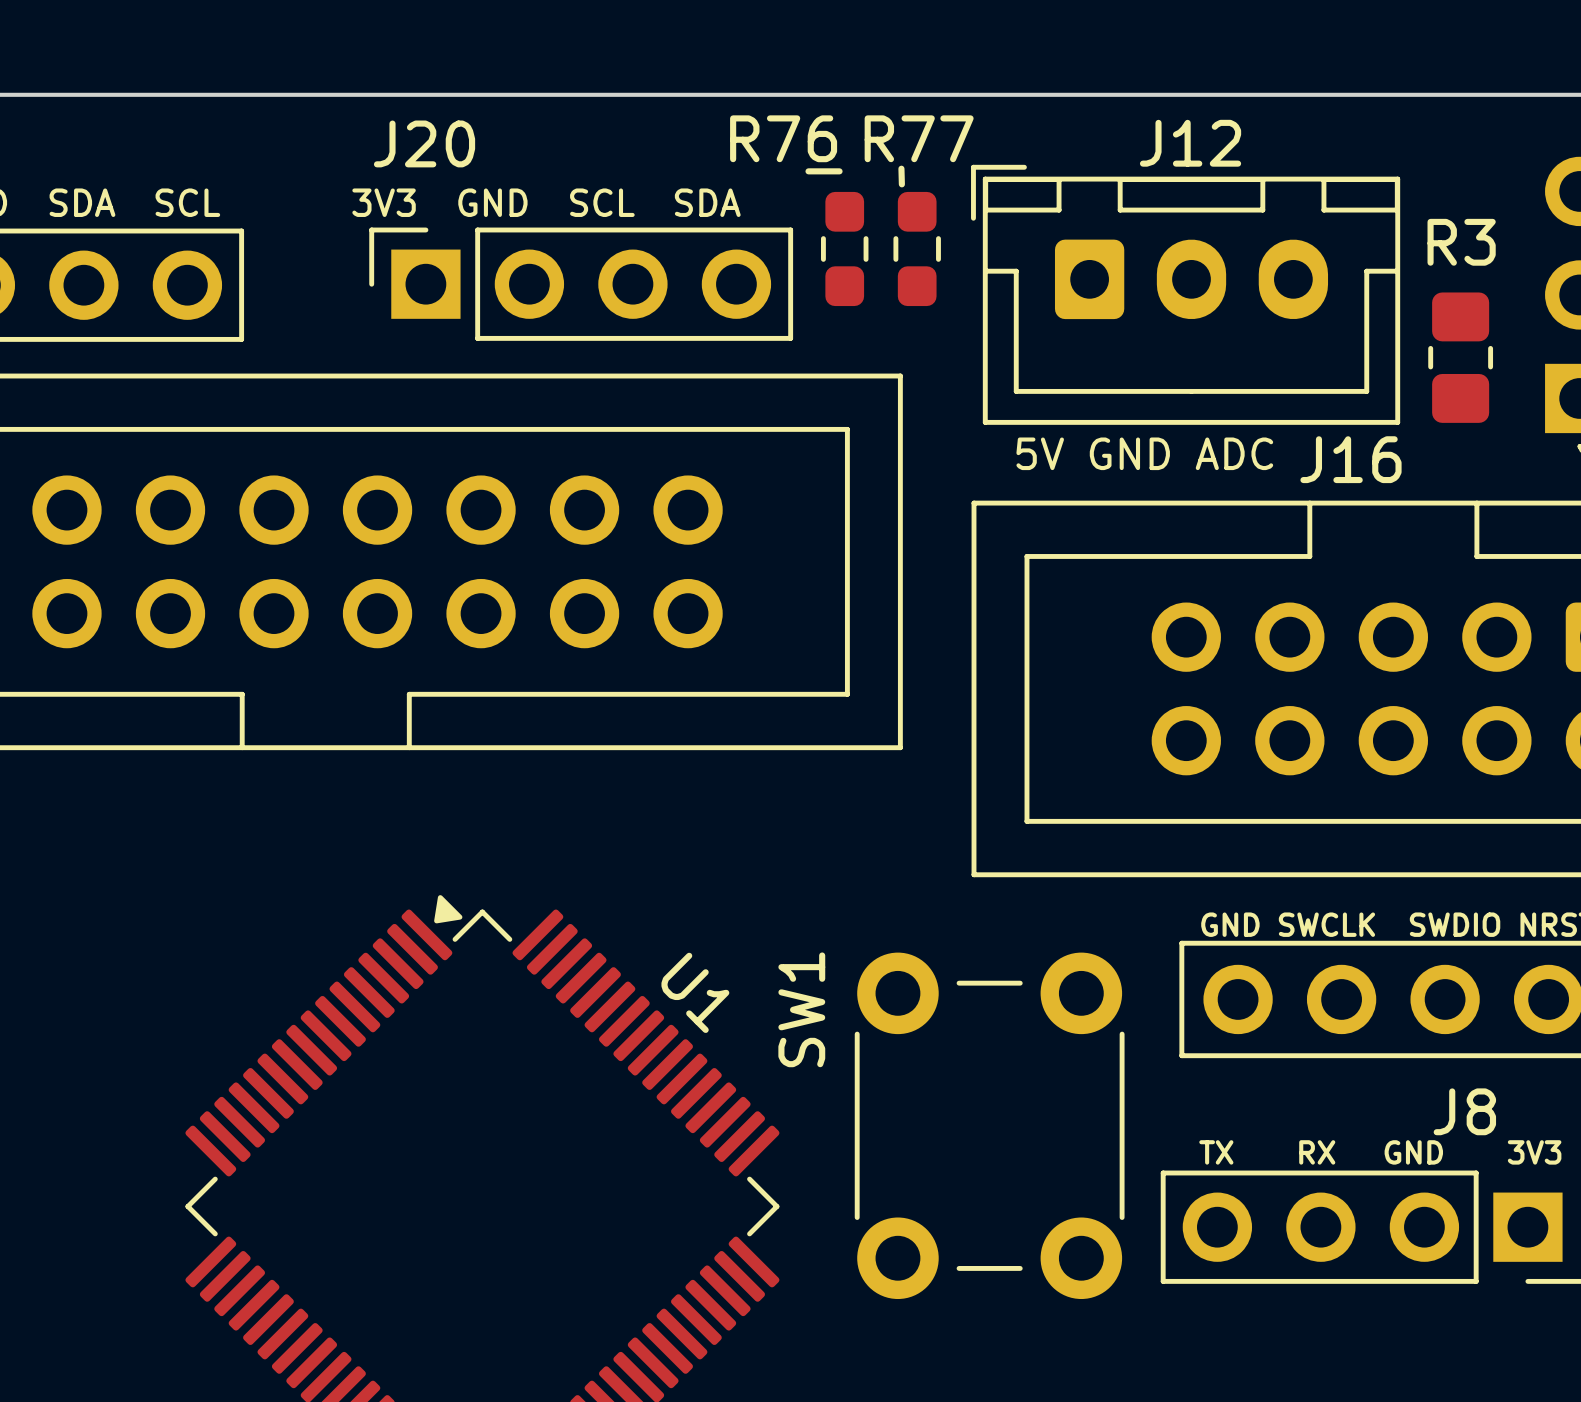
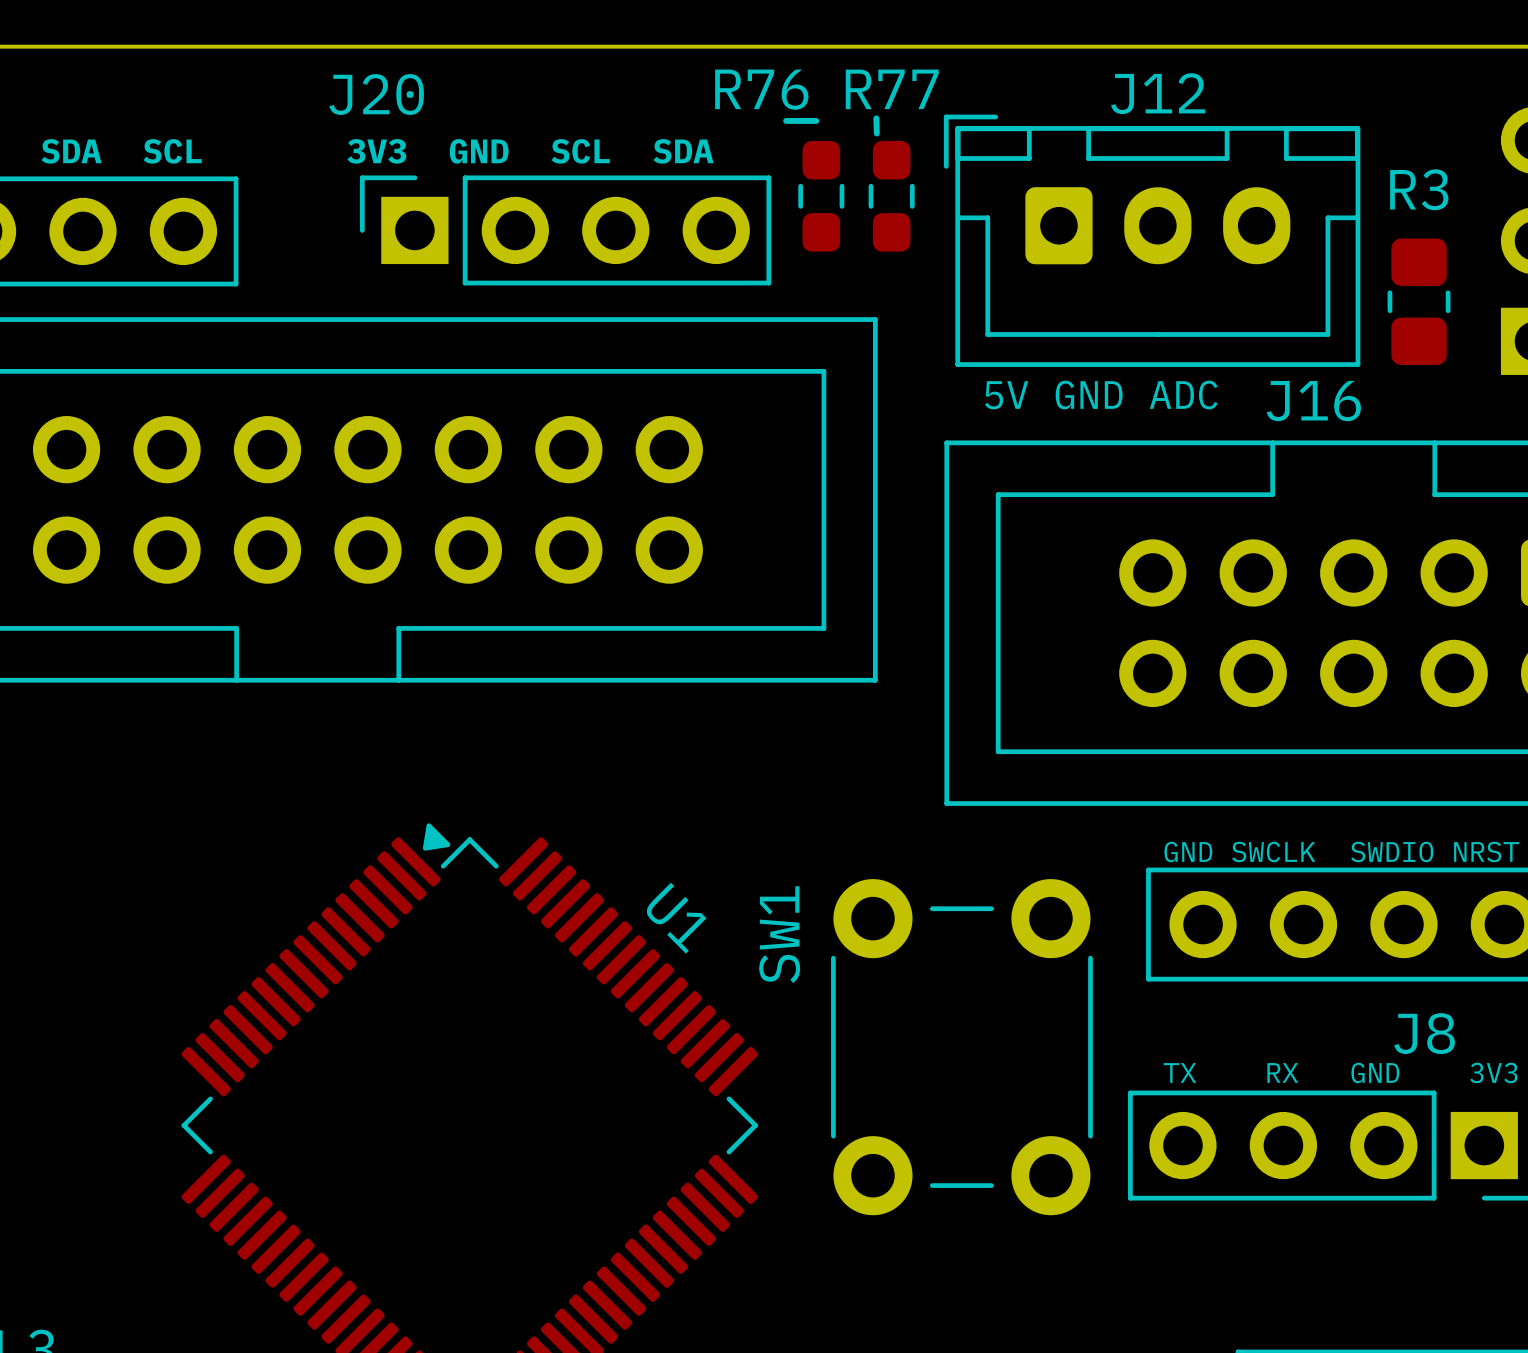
J20 name position: J20 (424, 143) -> J20 (376, 94)

